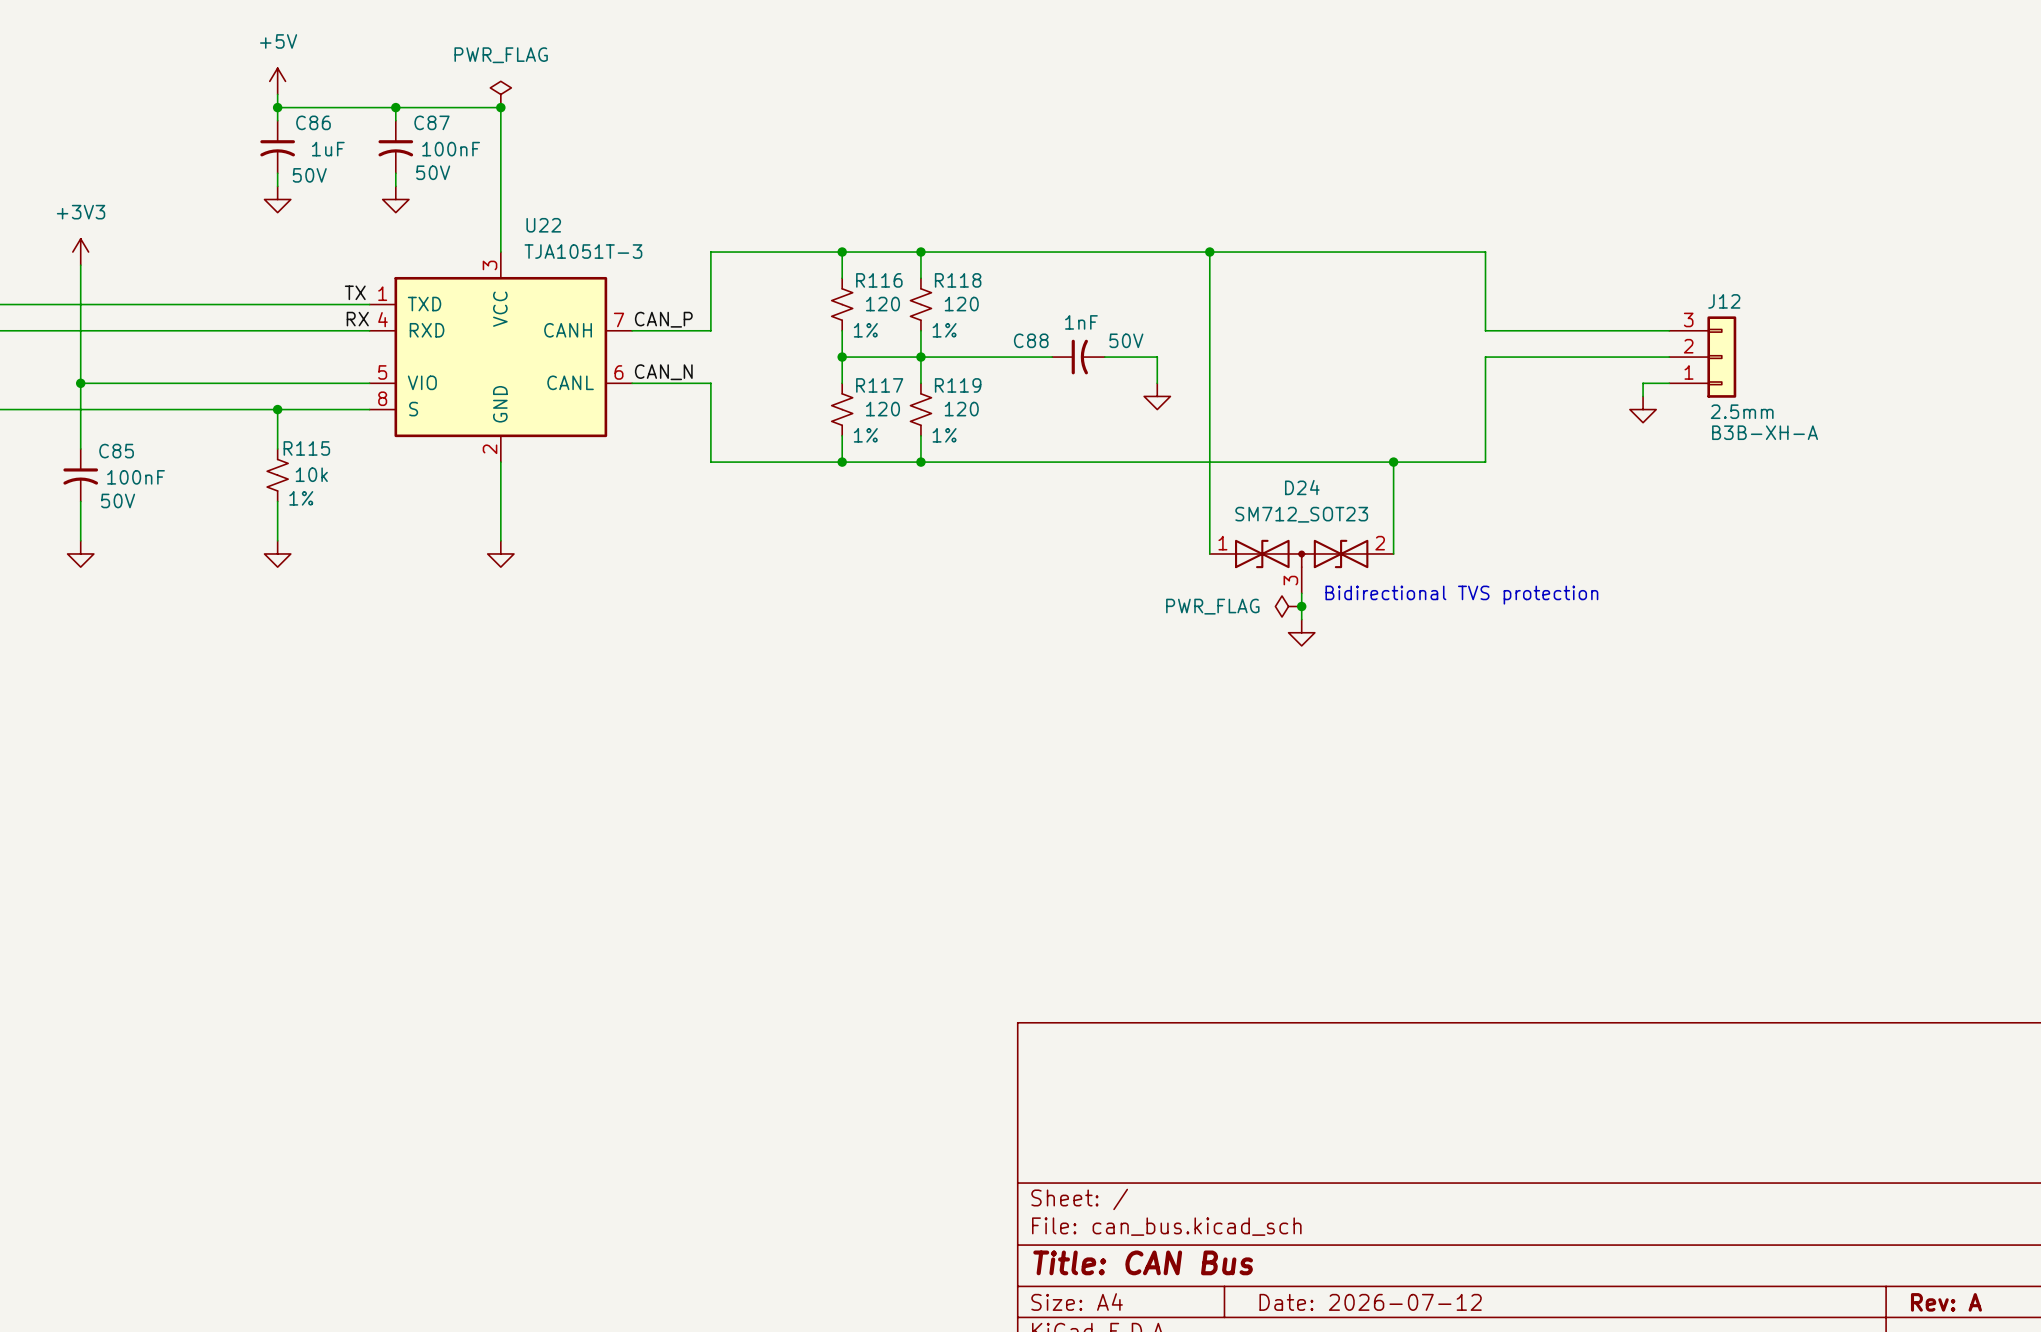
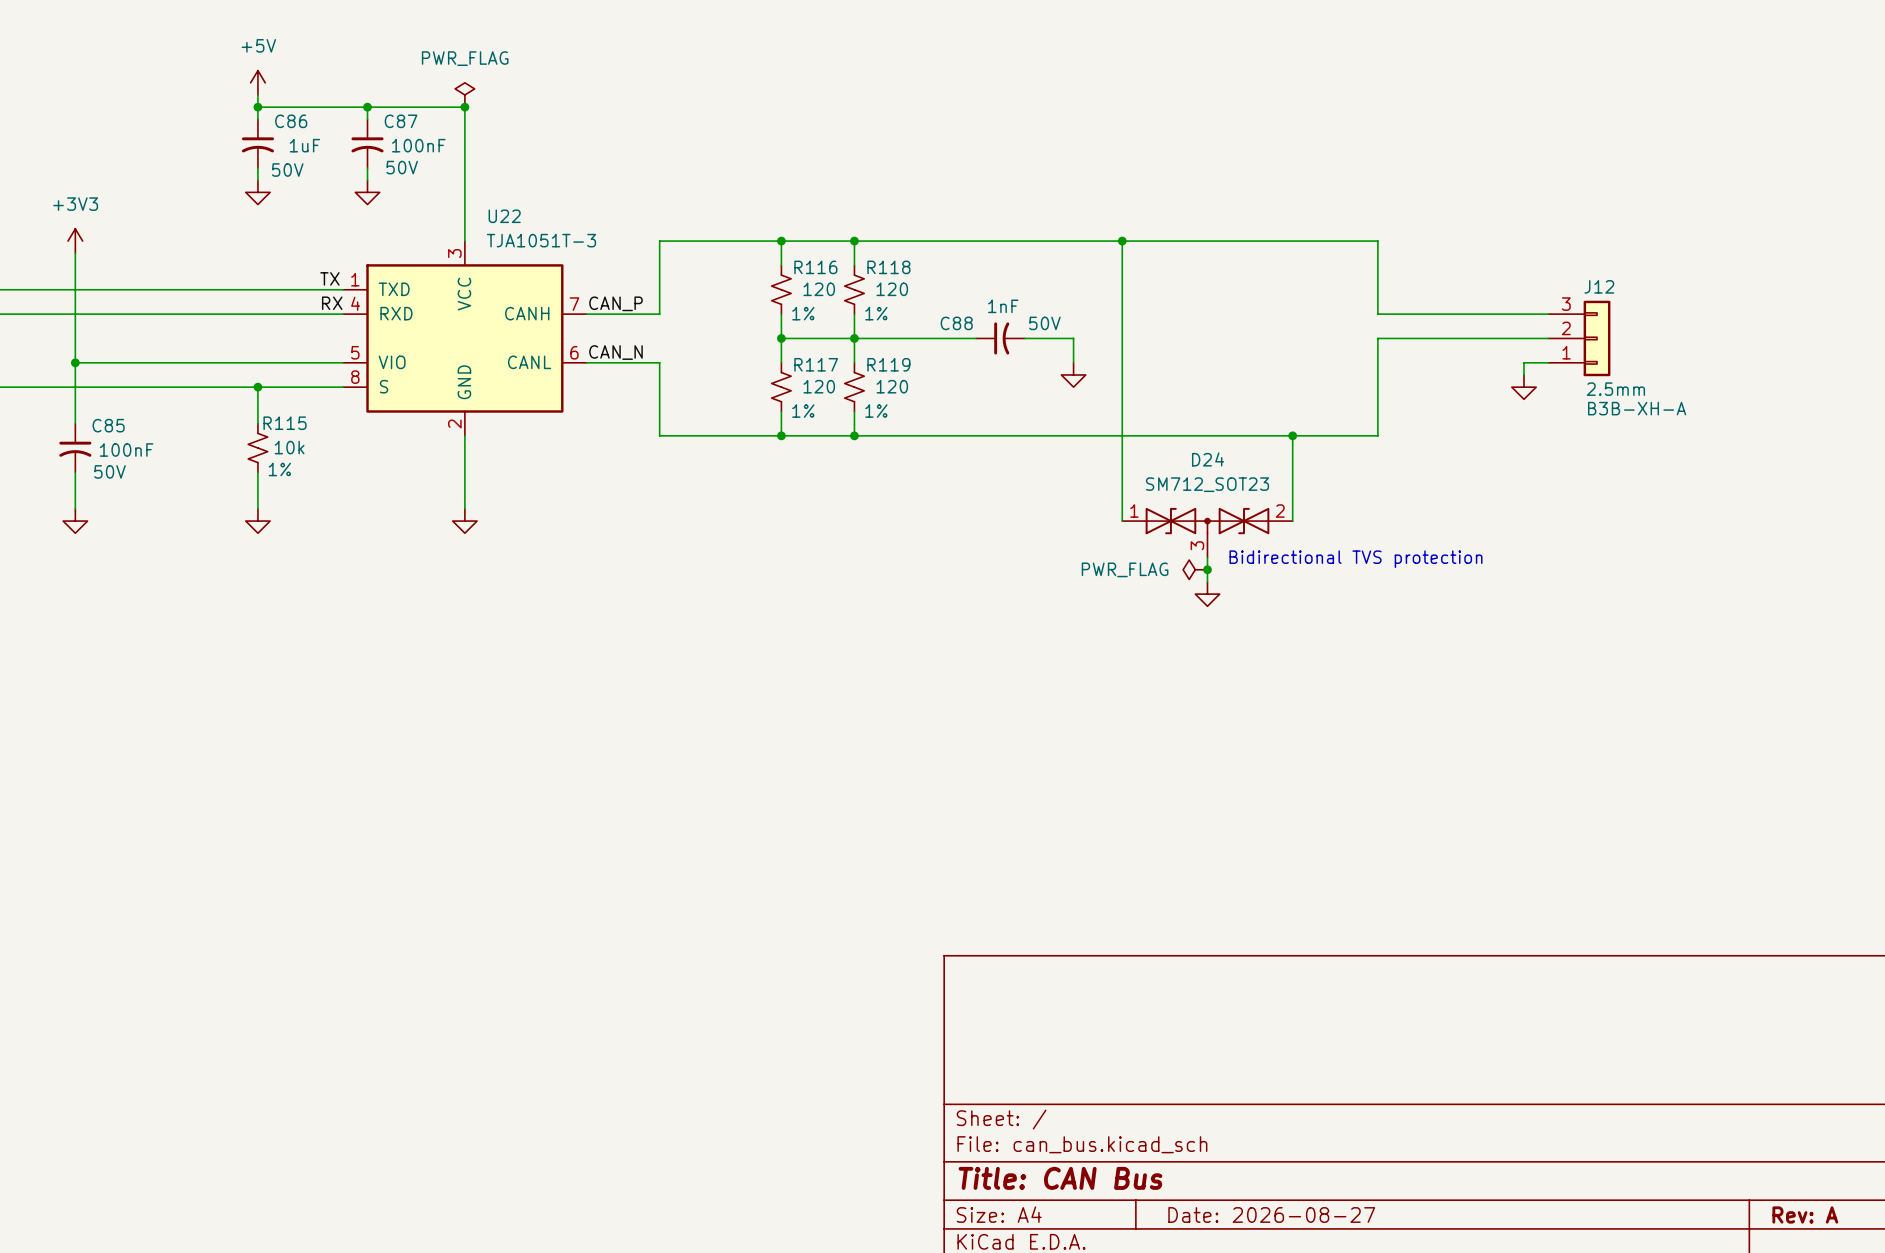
title block: Date: 2026-07-12 (1370, 1302) -> Date: 2026-08-27 (1271, 1214)

